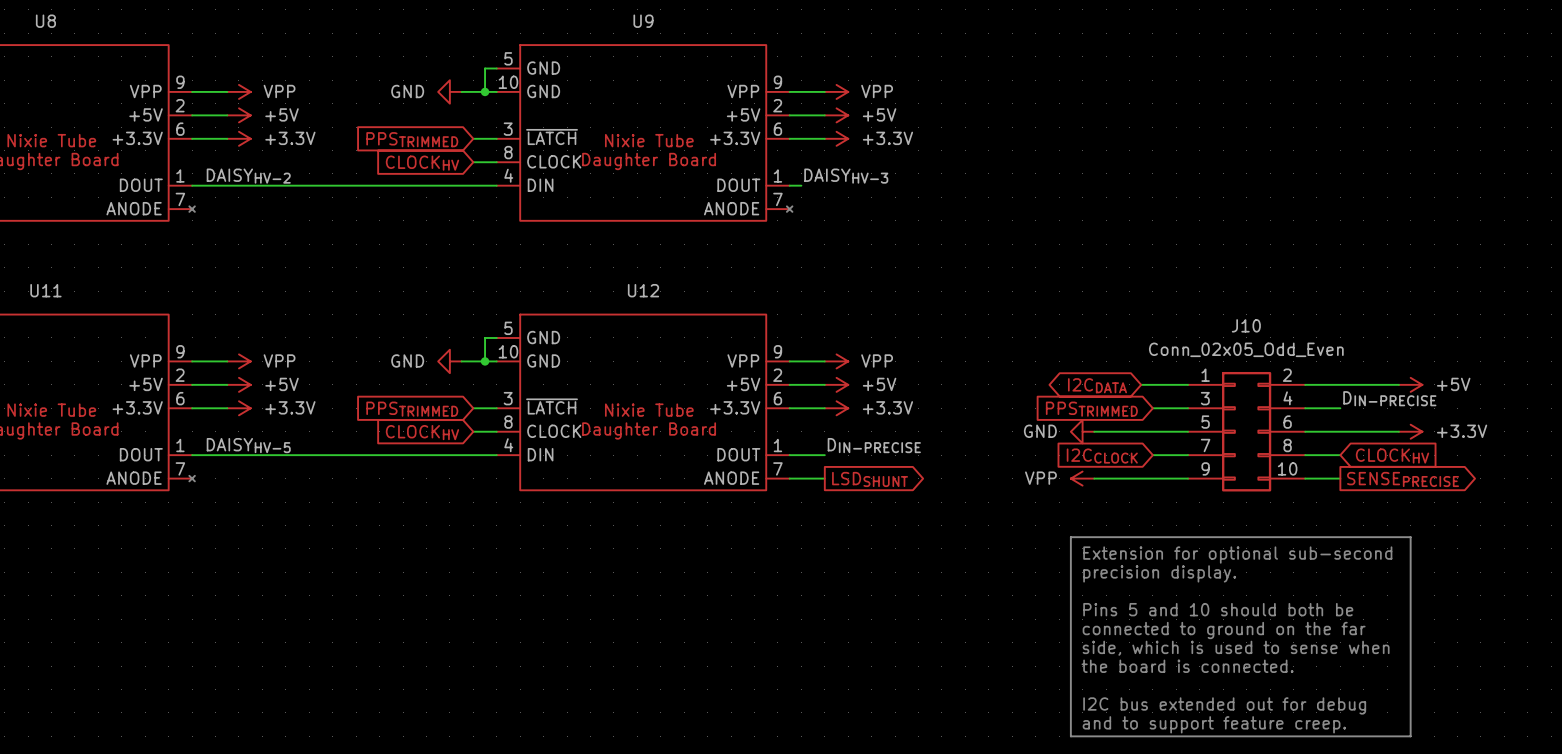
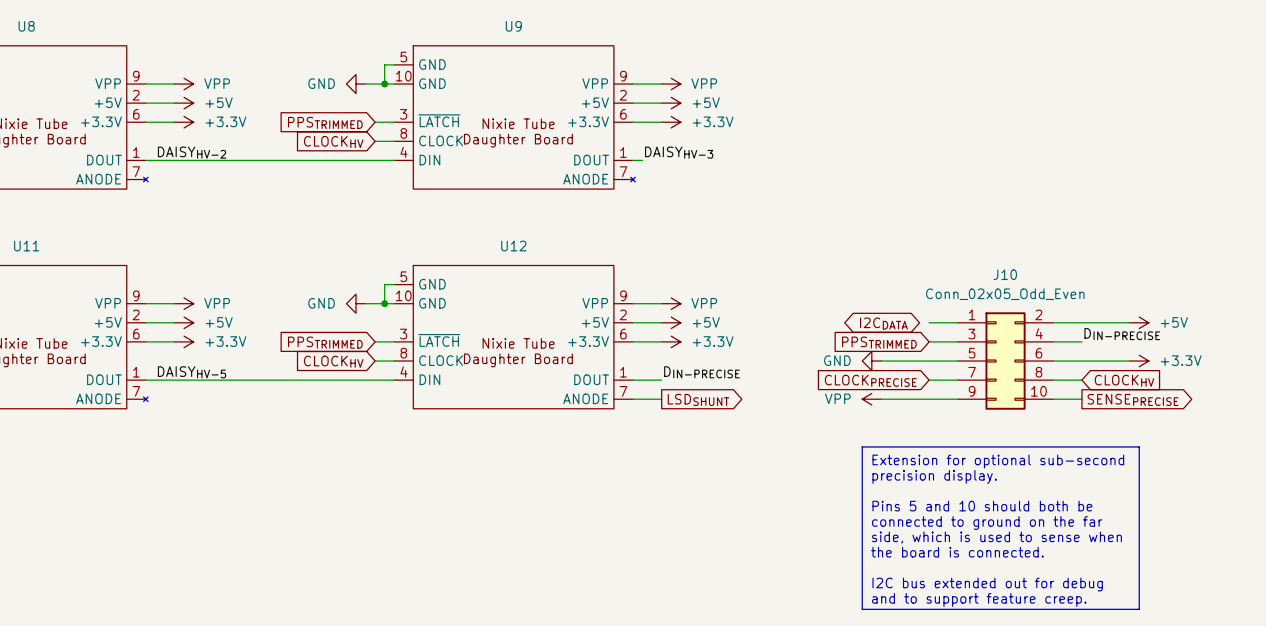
wire: (1141, 384) (1152, 384) -> none
global label: I2CCLOCK (1102, 456) -> CLOCKPRECISE (870, 380)

